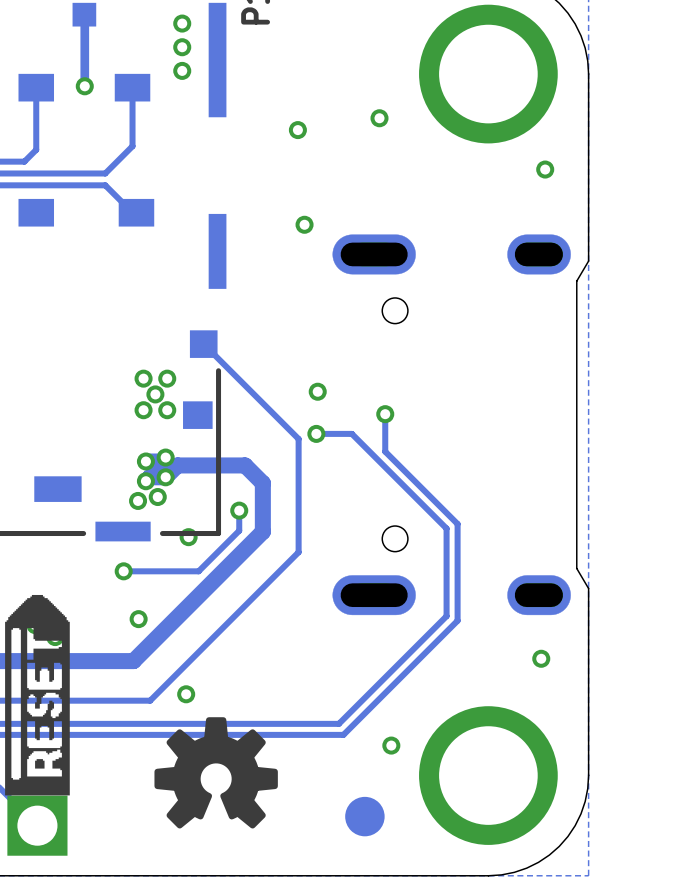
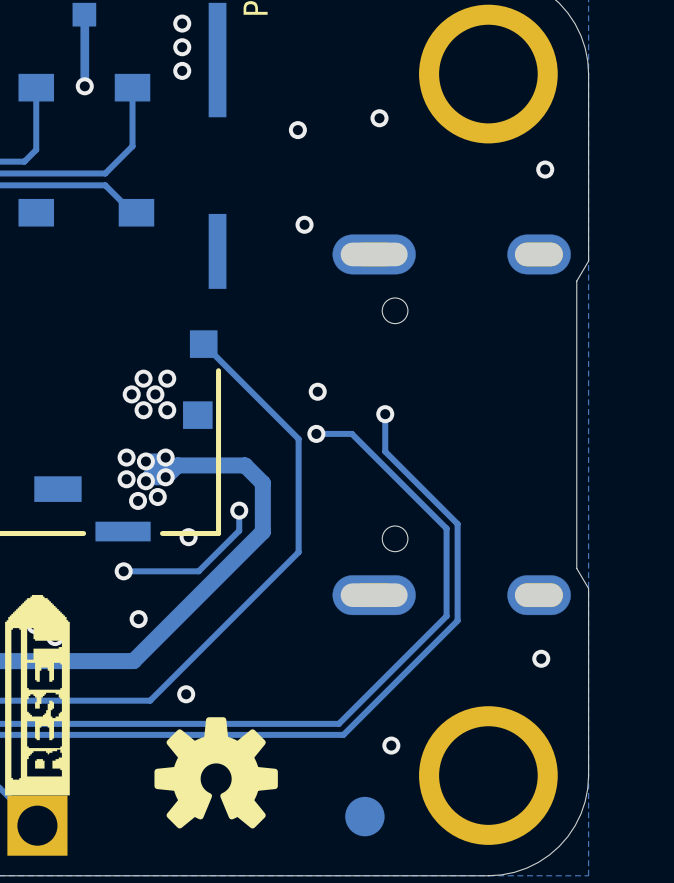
via: none -> (131, 394)
via: none -> (126, 457)
via: none -> (126, 479)

